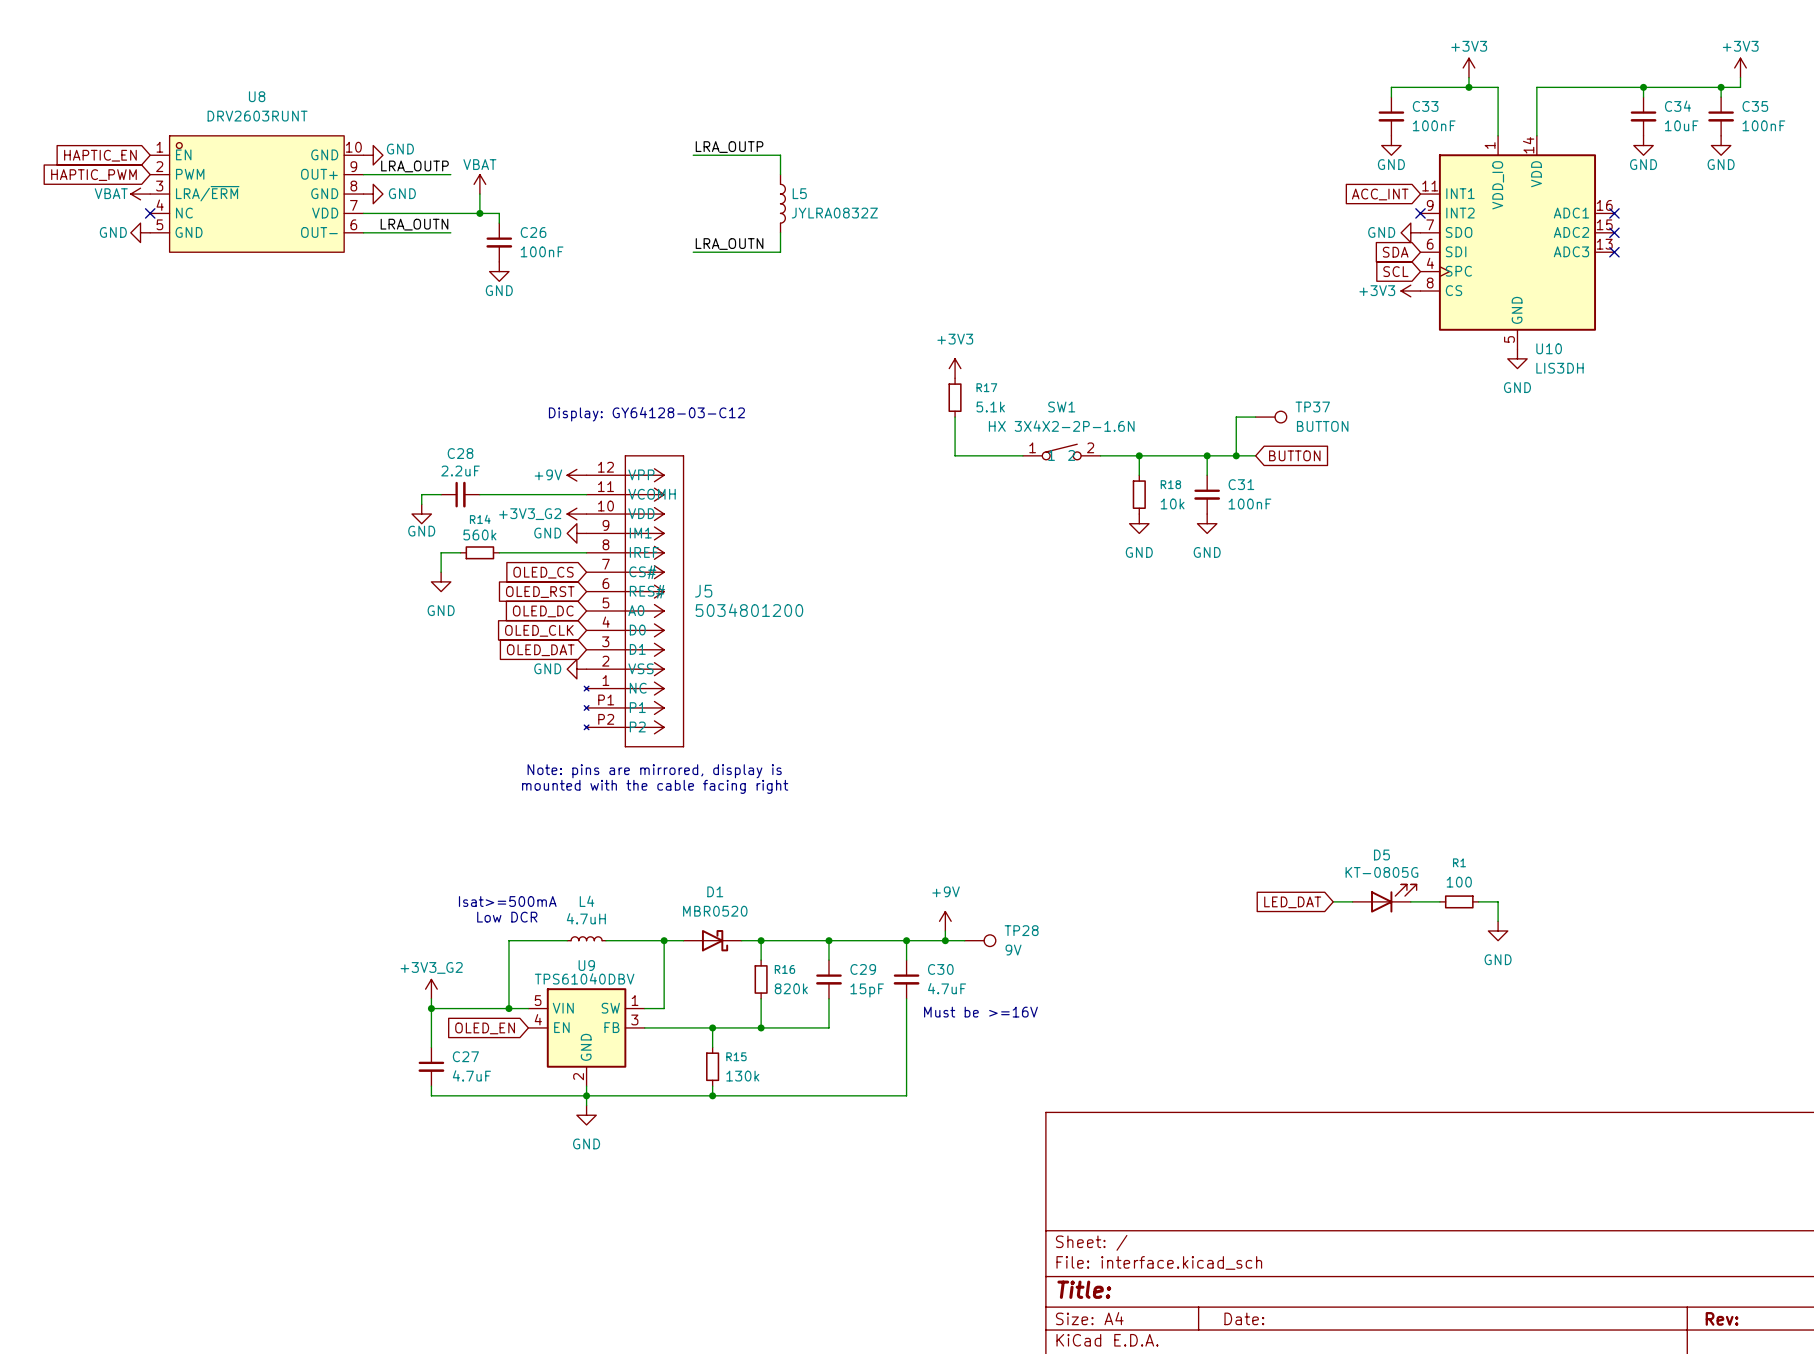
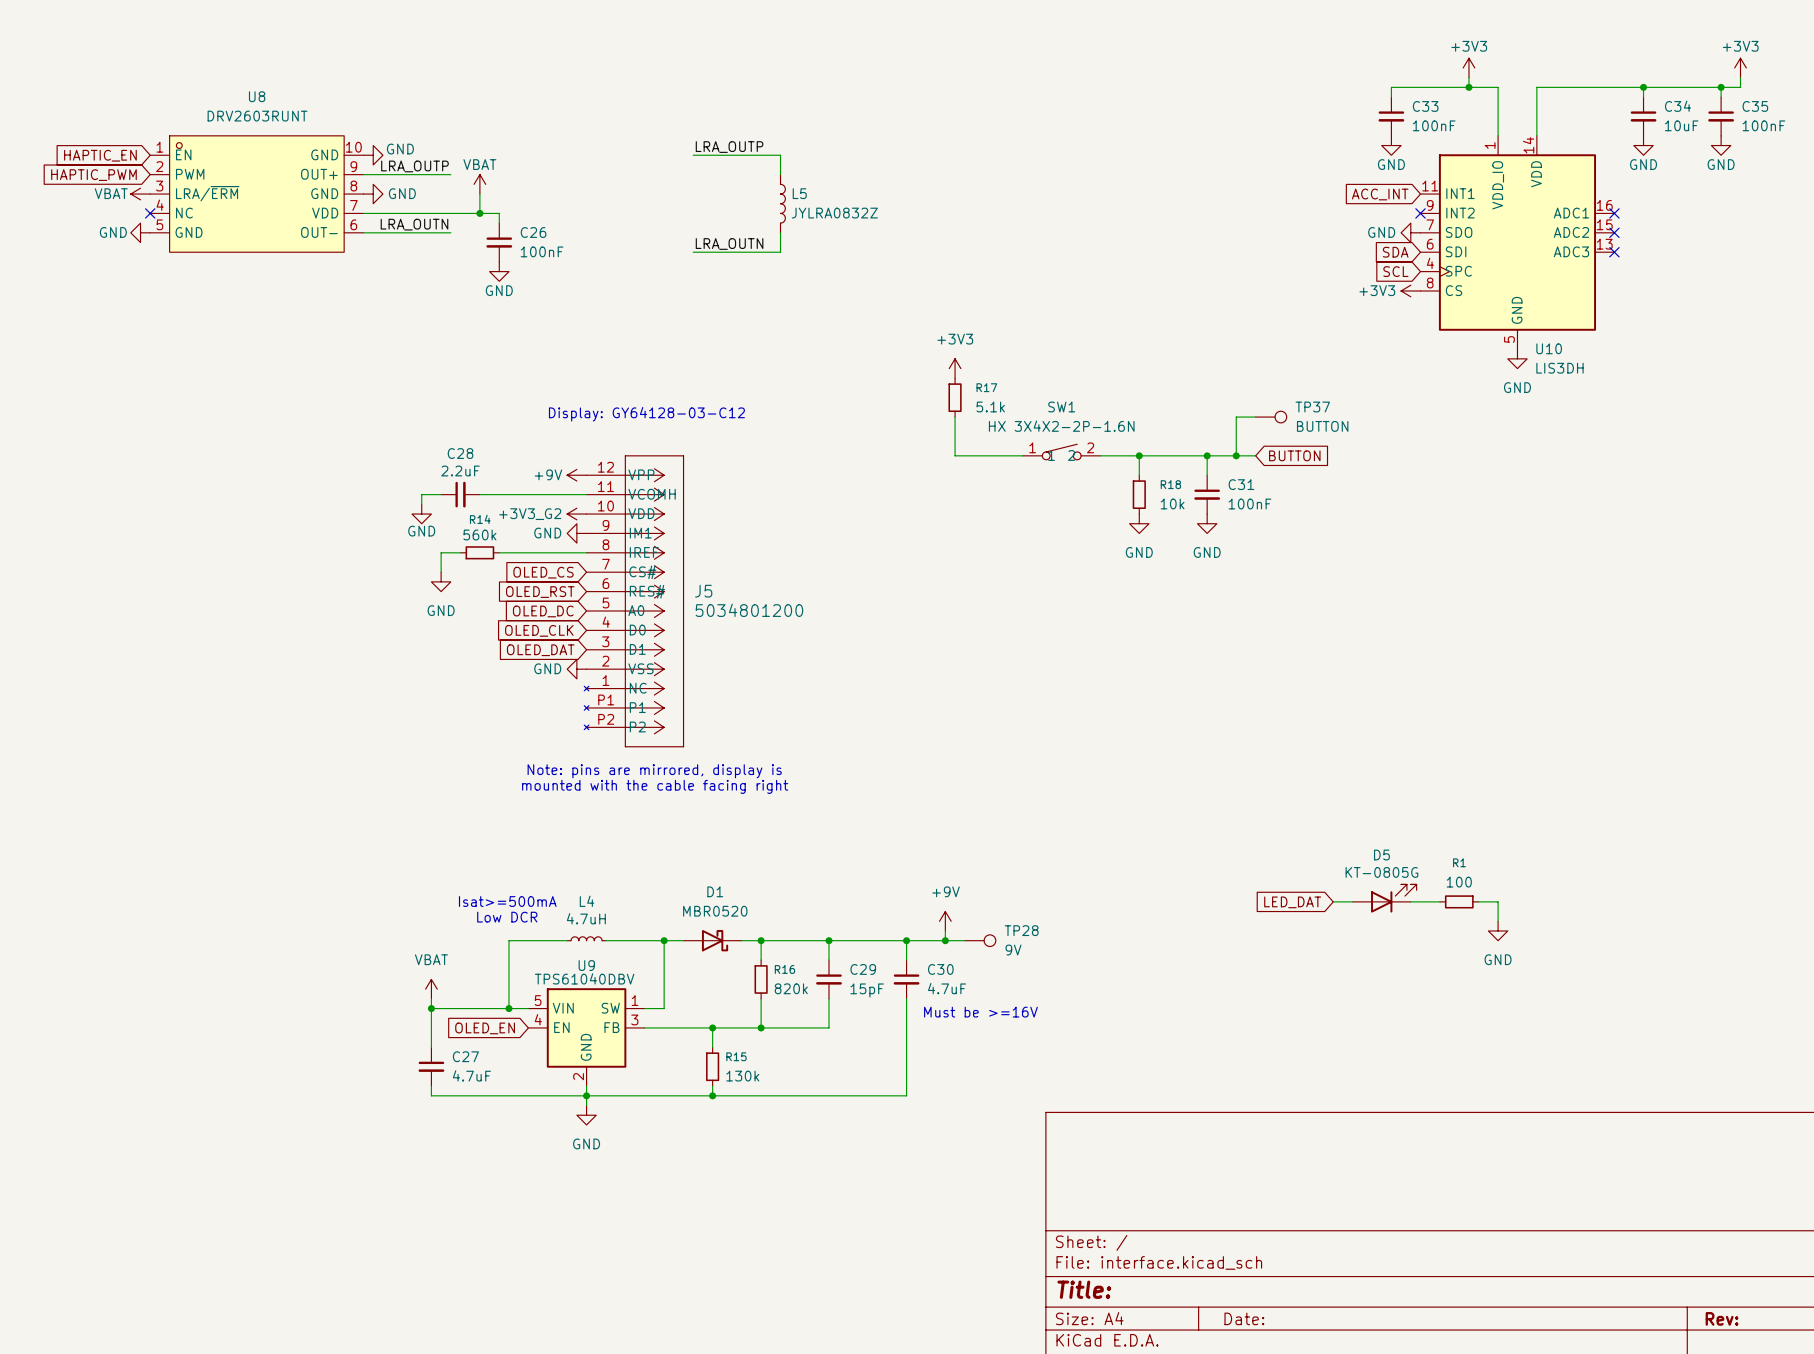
power symbol: +3V3_G2 (431, 989) -> VBAT (431, 989)

